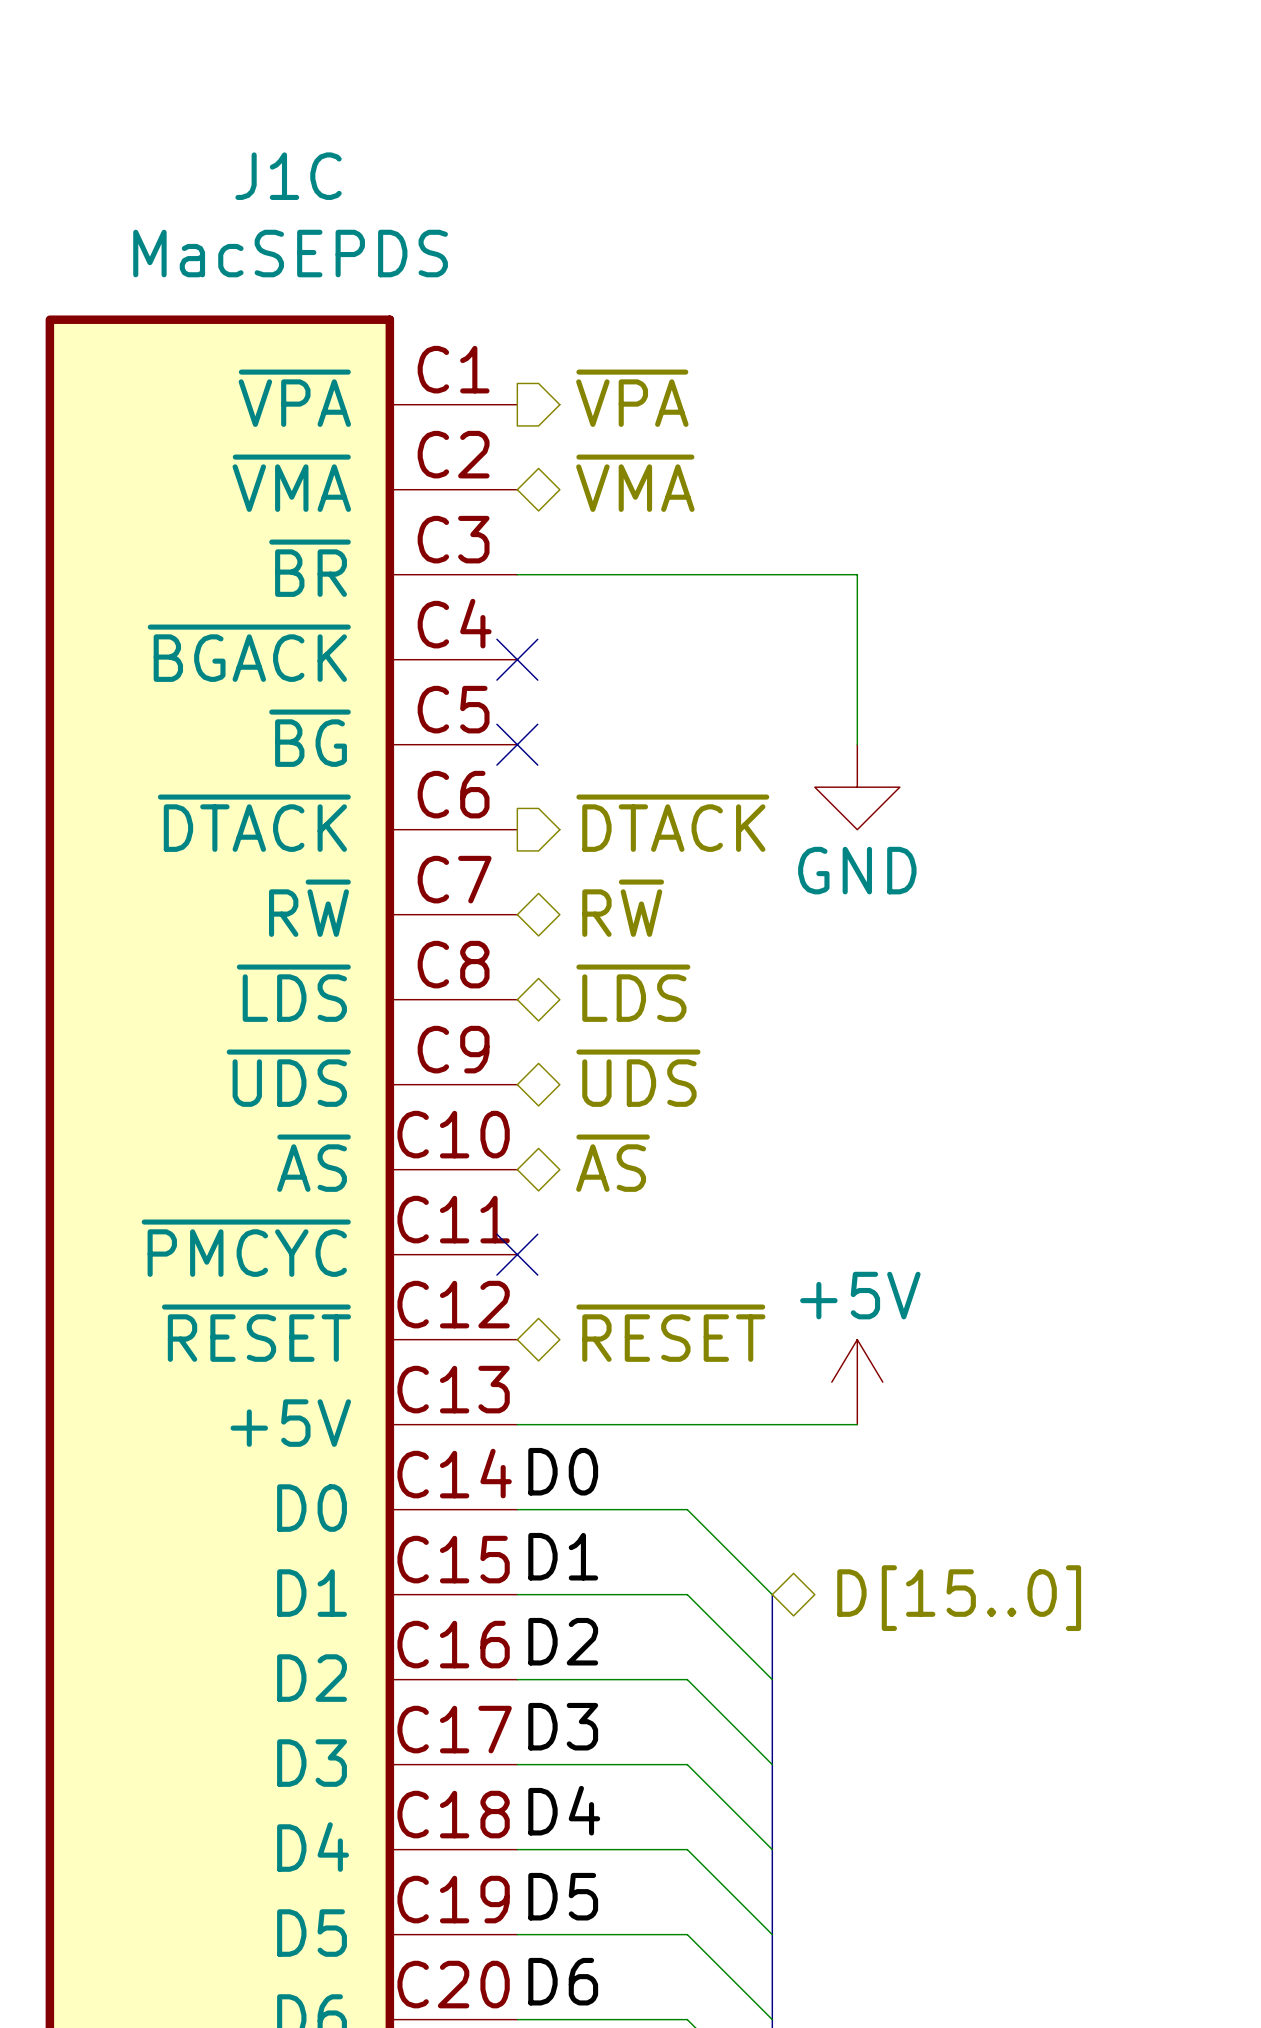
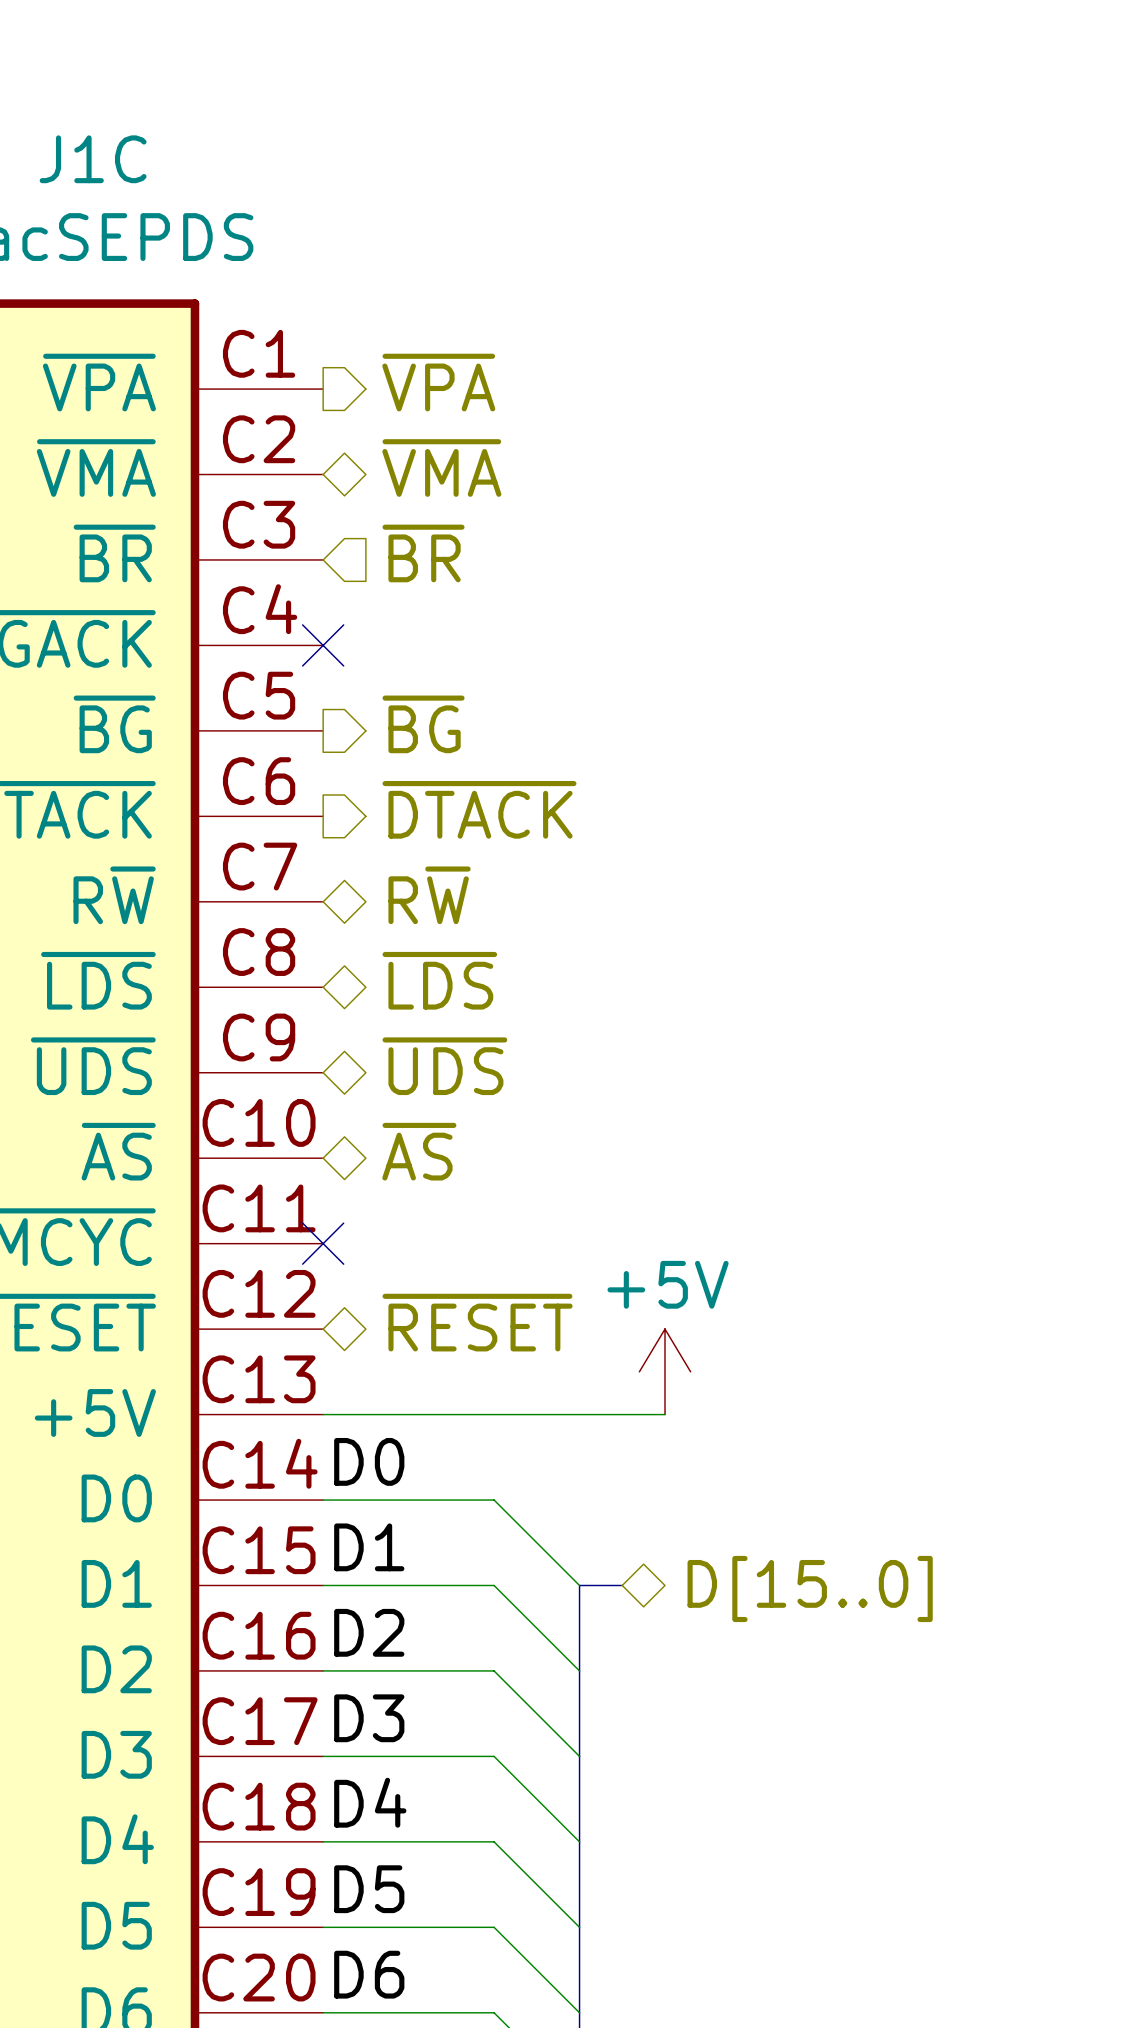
hierarchical label: none -> ~{BR} (423, 553)
wire: (517, 574) (857, 574) (857, 744) -> none
hierarchical label: none -> ~{BG} (423, 724)
no-connect mark: (517, 744) -> none
power symbol: GND (857, 787) -> none
bus: none -> (579, 1585) (622, 1585)
hierarchical label position: D[15..0] (959, 1598) -> D[15..0] (810, 1588)

